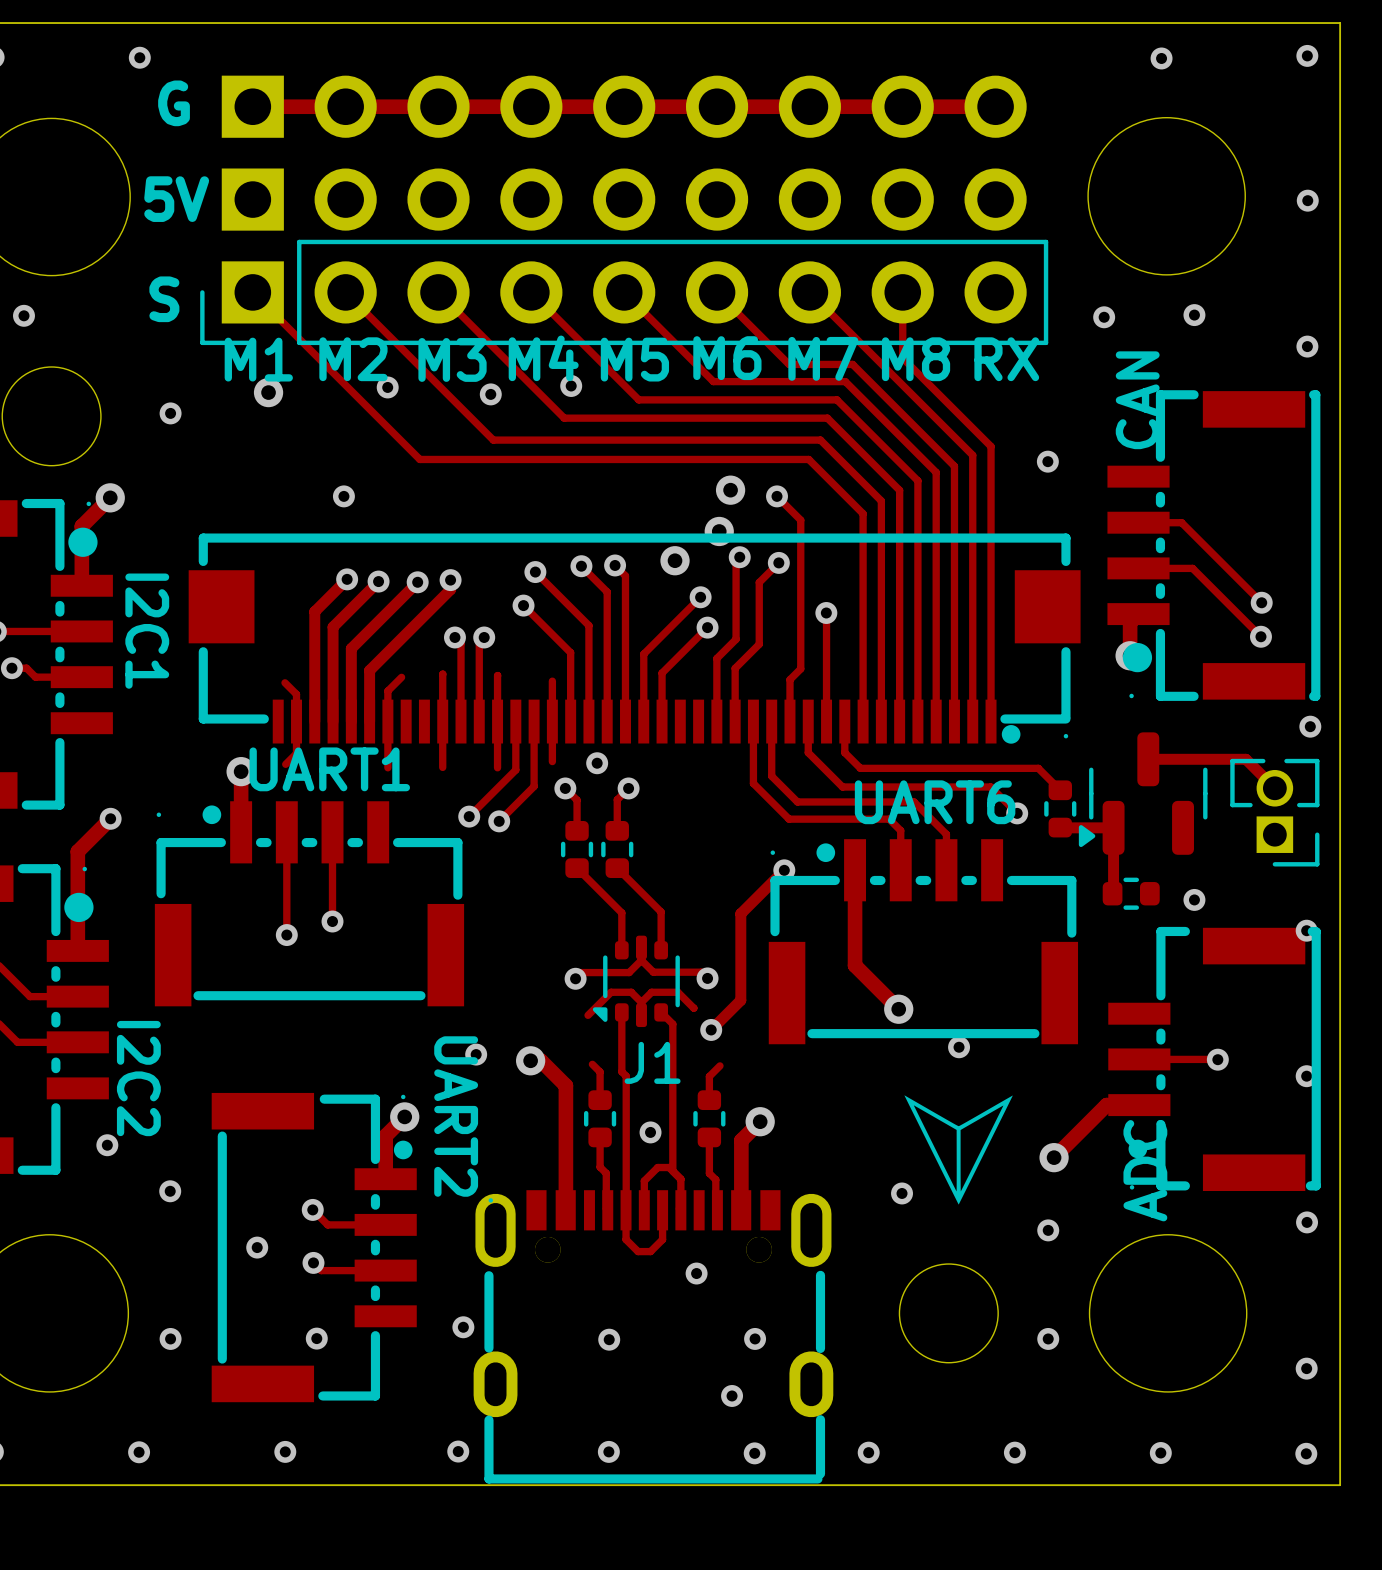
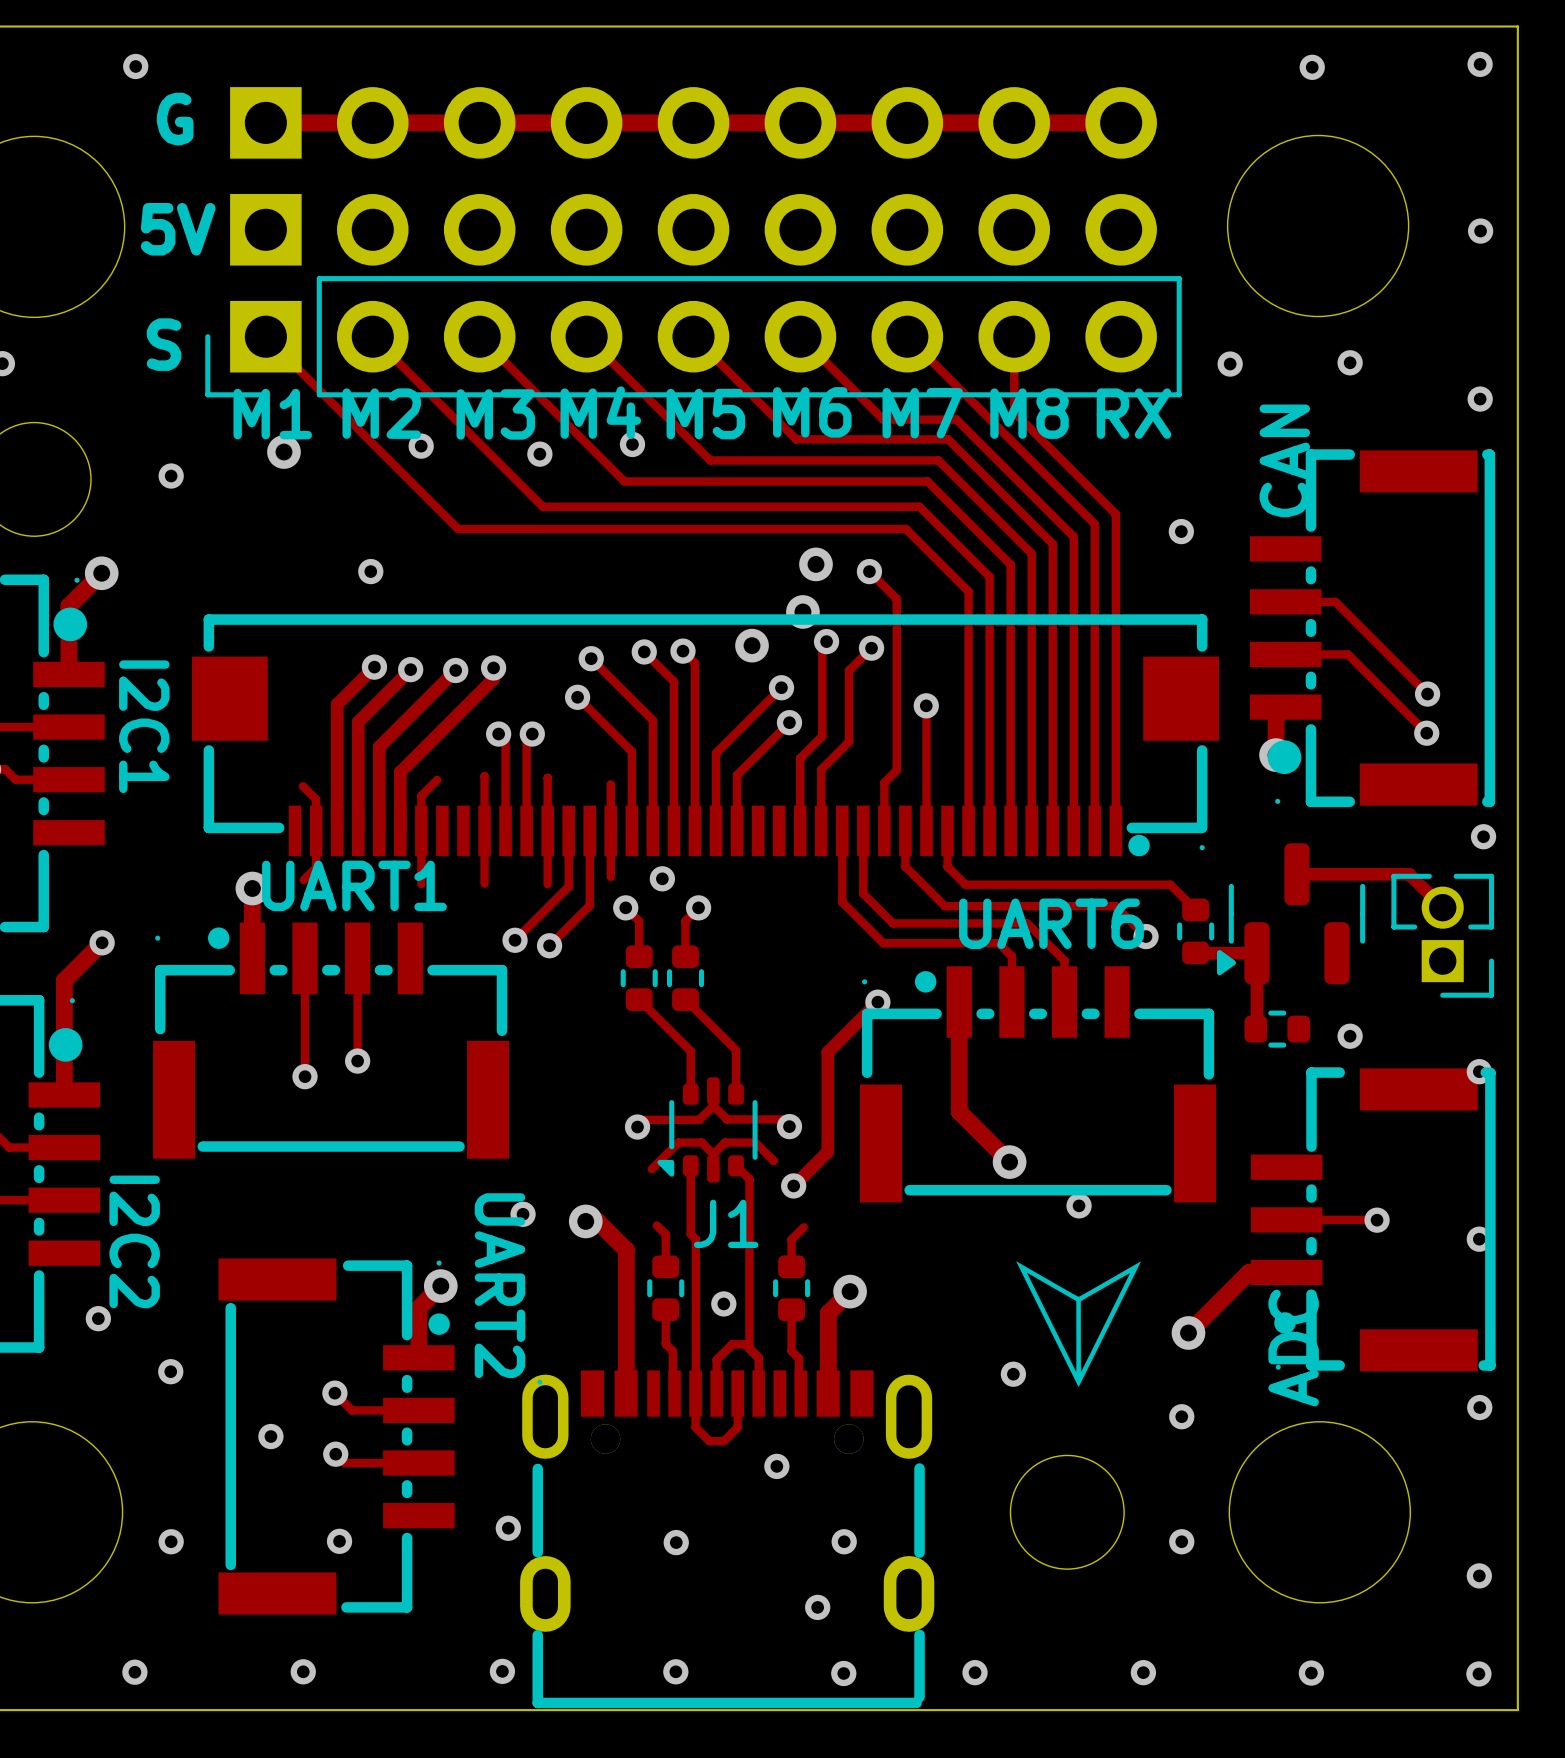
via position: (1104, 317) -> (1230, 364)

